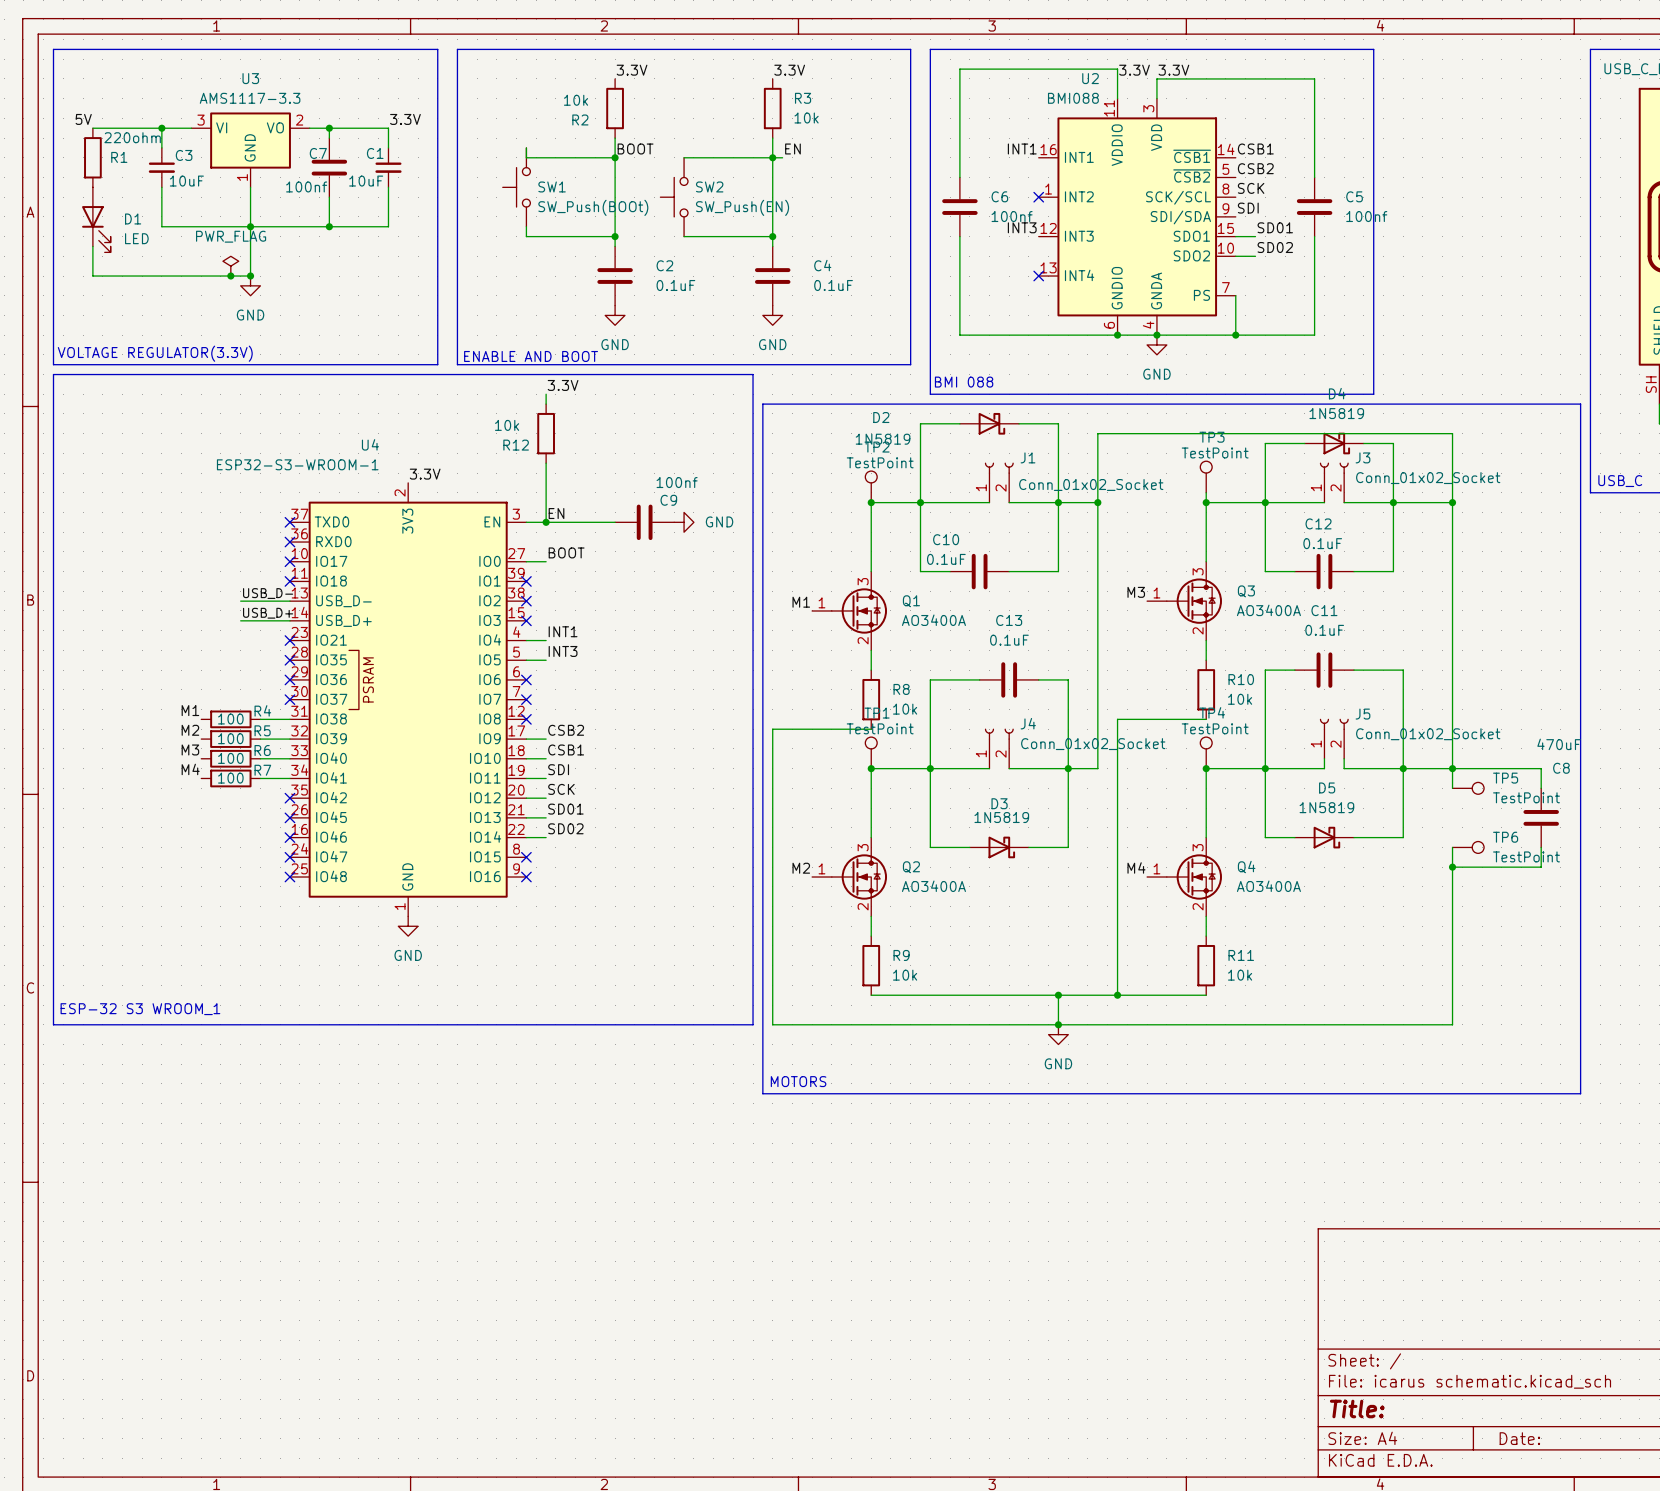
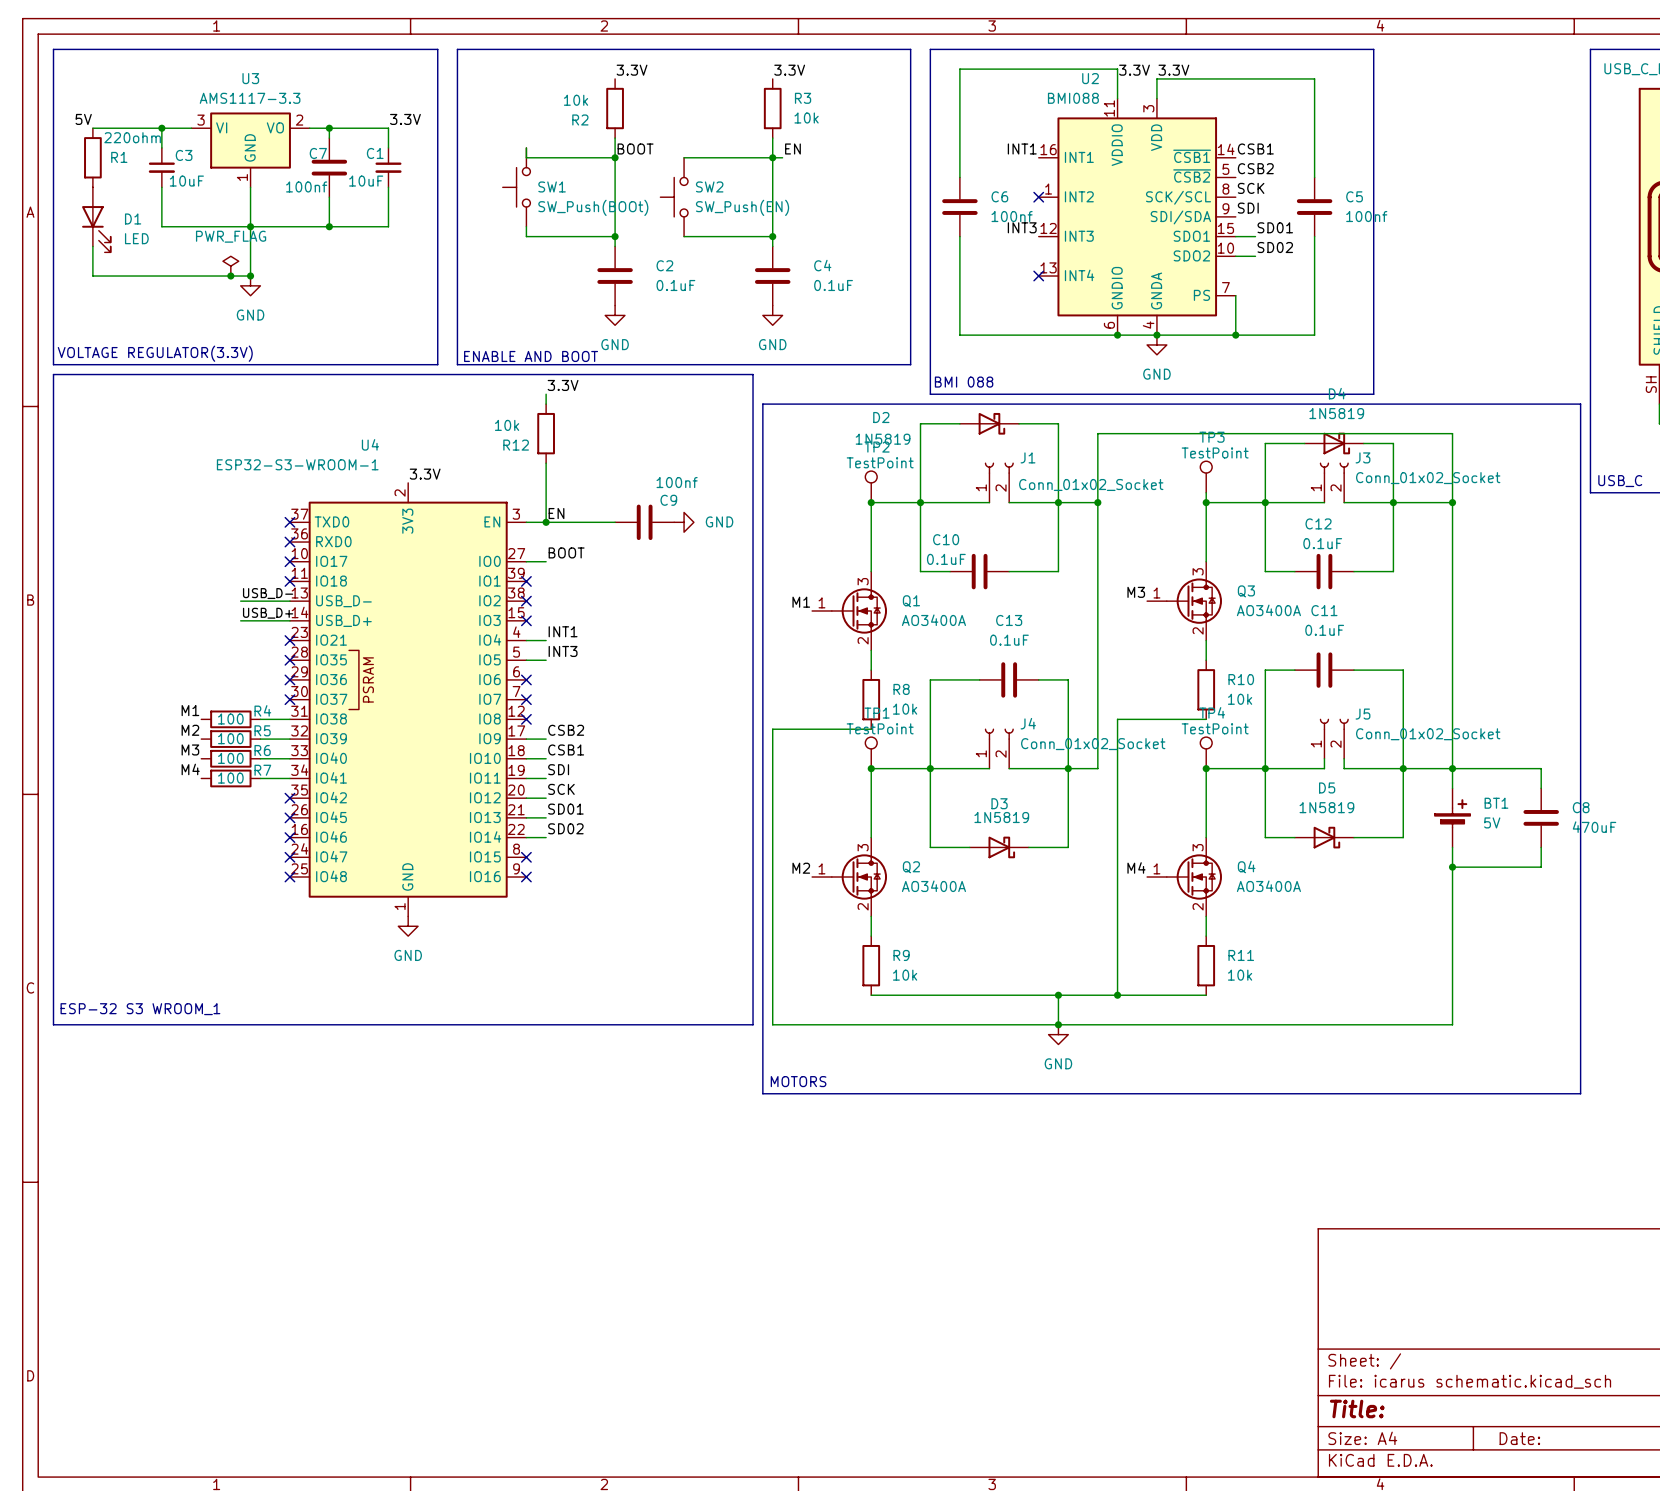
C8 value position: 470uF (1559, 744) -> 470uF (1594, 827)
C8 name position: C8 (1561, 768) -> C8 (1581, 807)
TP5: TestPoint (1468, 788) -> none
BT1: none -> 5V (1452, 817)
TP6: TestPoint (1468, 847) -> none

